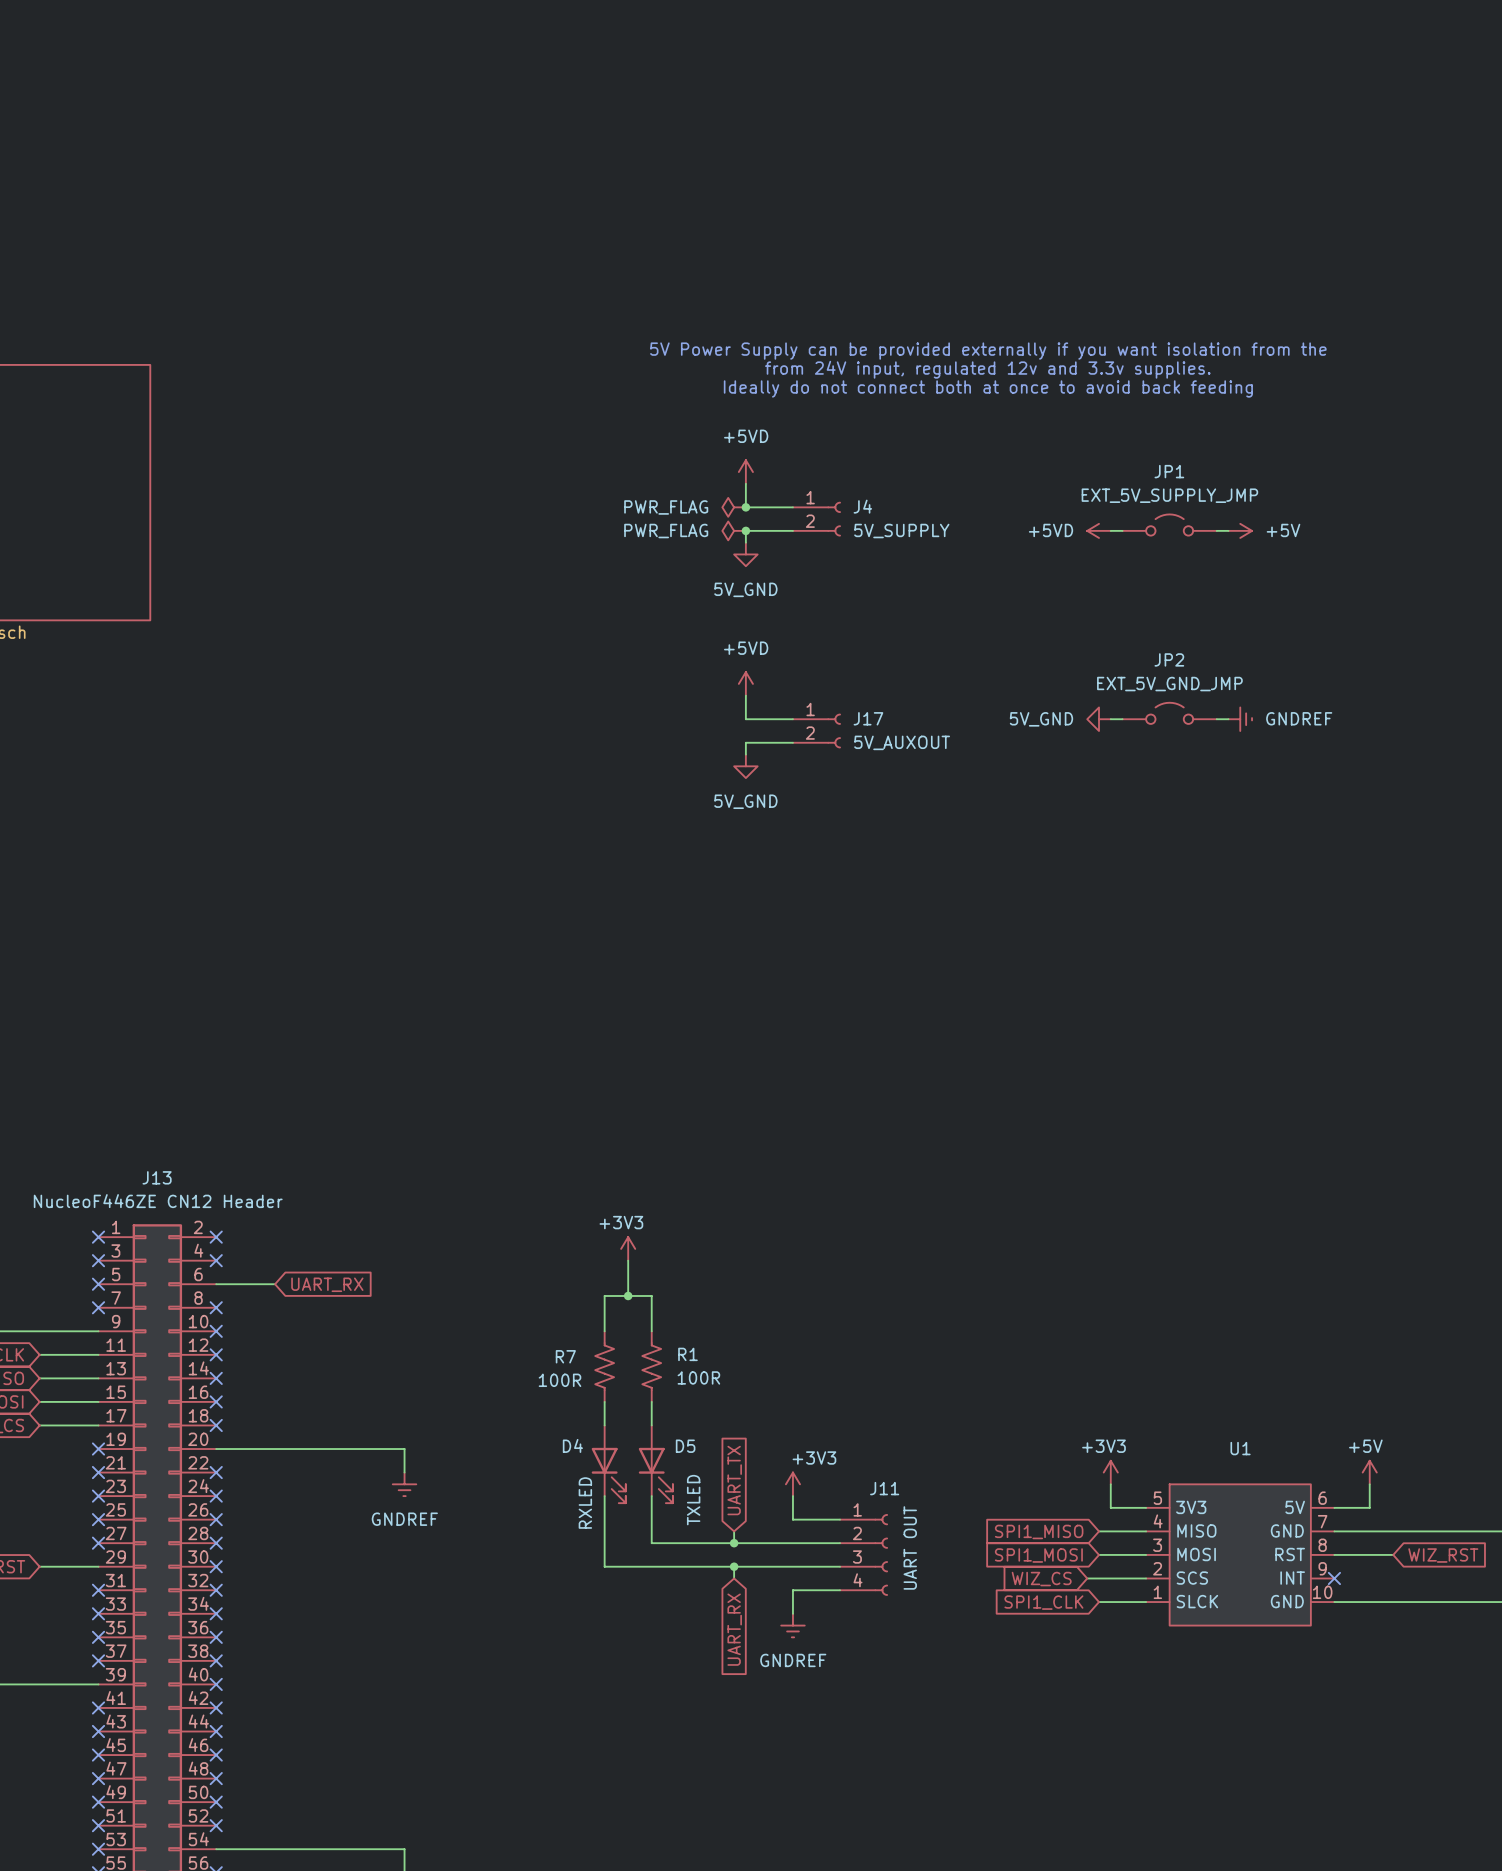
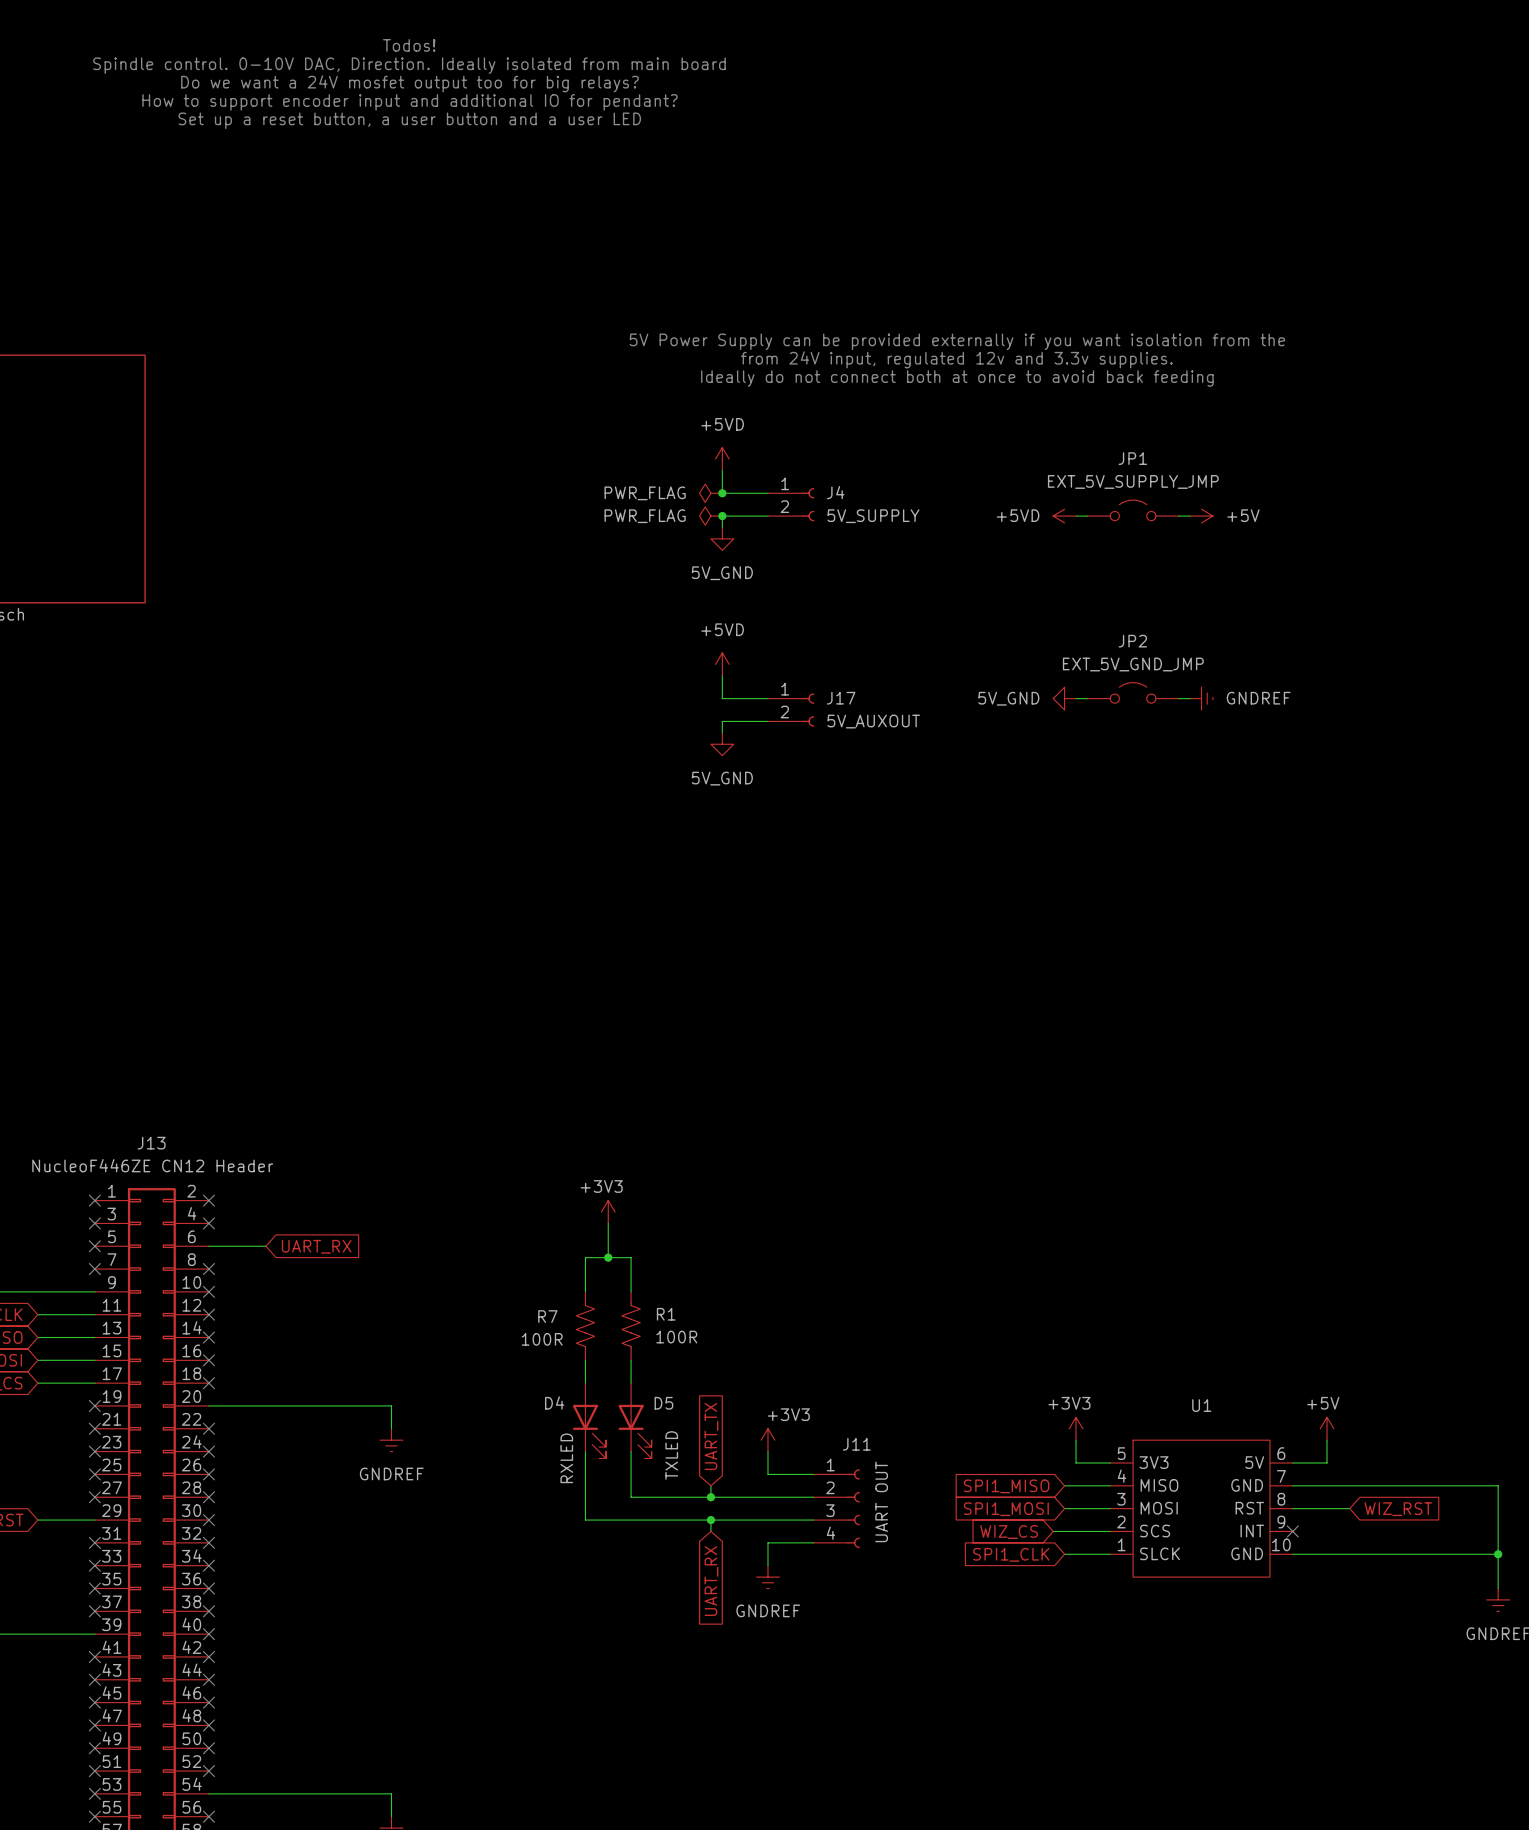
text: none -> Todos! (409, 45)
text: none -> Spindle control. 0-10V DAC, Direction. Ideally isolated from main board (409, 65)
text: none -> Do we want a 24V mosfet output too for big relays? (410, 83)
text: none -> How to support encoder input and additional IO for pendant? (410, 102)
text: none -> Set up a reset button, a user button and a user LED (409, 120)

